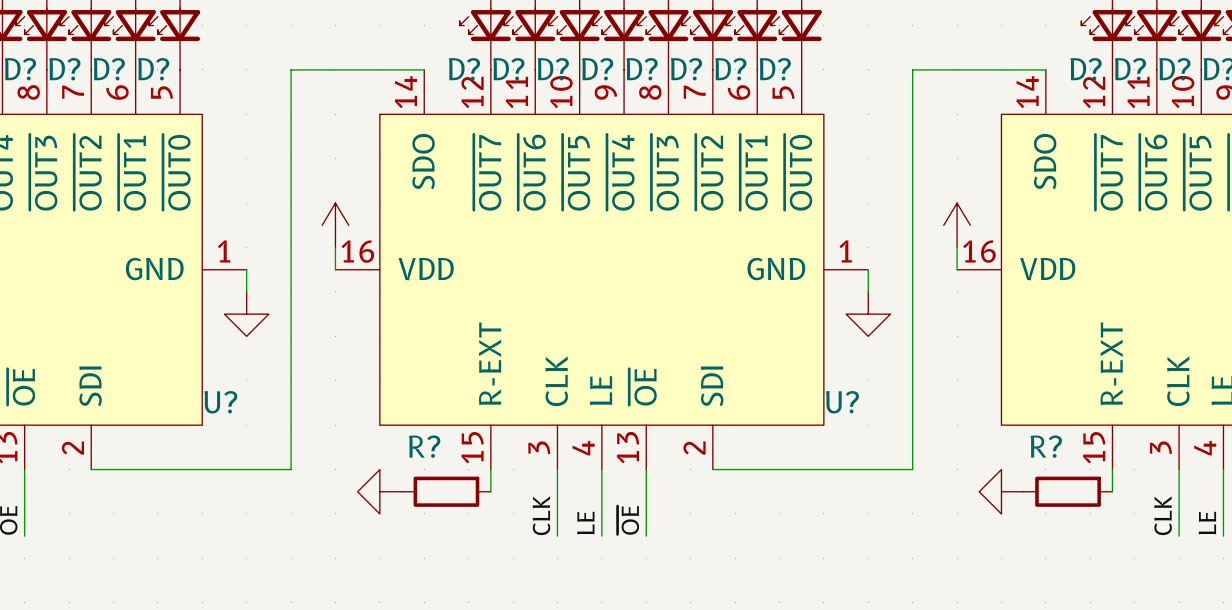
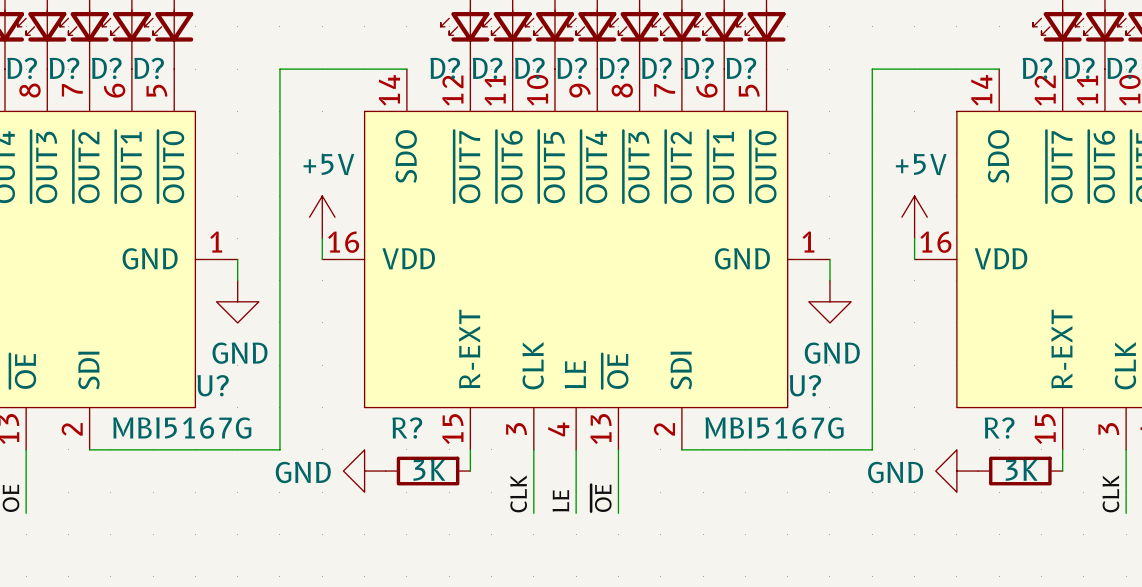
power symbol text: none -> +5V (328, 164)
power symbol text: none -> +5V (921, 164)
power symbol text: none -> GND (239, 353)
power symbol text: none -> GND (832, 353)
U? value: none -> MBI5167G (182, 428)
U? value: none -> MBI5167G (774, 428)
R? value: none -> 3K (429, 470)
R? value: none -> 3K (1021, 470)
power symbol text: none -> GND (303, 472)
power symbol text: none -> GND (895, 472)

